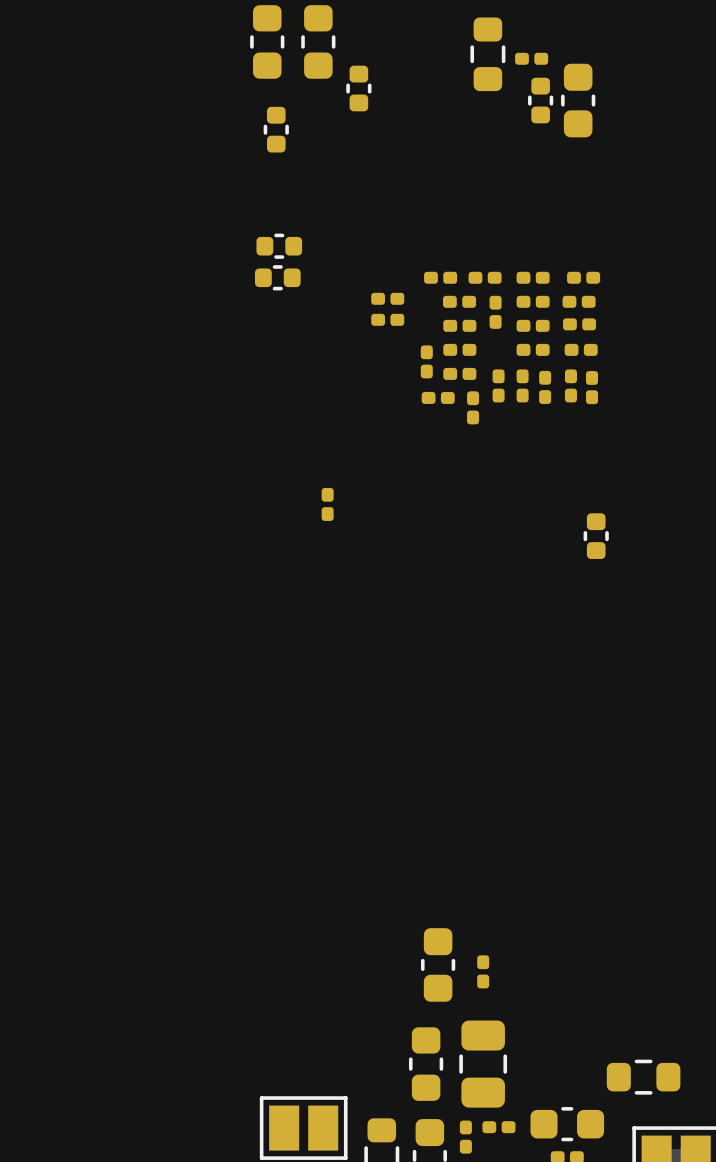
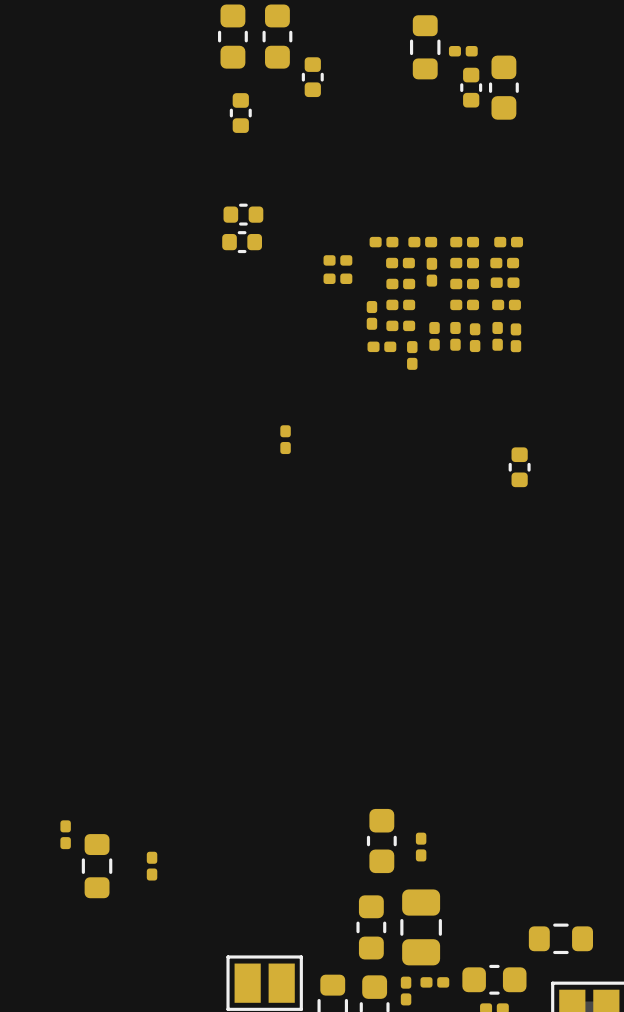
part: none -> (65, 834)
part: none -> (97, 866)
part: none -> (152, 866)

